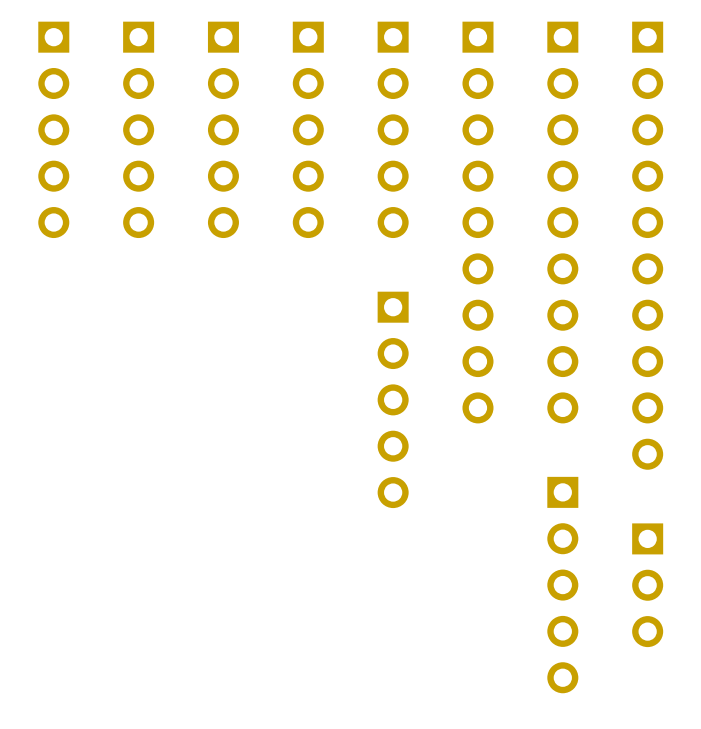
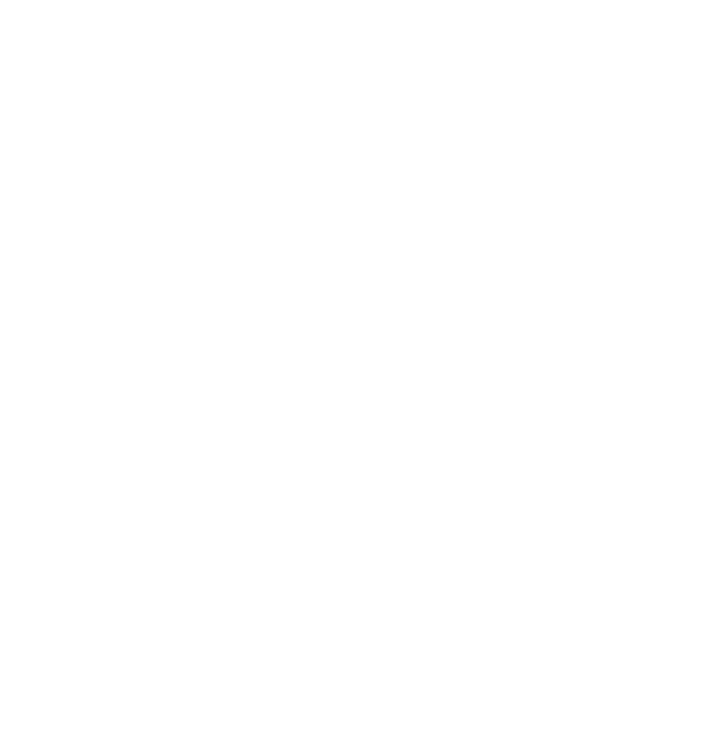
part: (53, 129) -> none
part: (138, 129) -> none
part: (223, 129) -> none
part: (308, 129) -> none
part: (393, 129) -> none
part: (477, 222) -> none
part: (562, 222) -> none
part: (647, 245) -> none
part: (393, 399) -> none
part: (562, 585) -> none
part: (647, 585) -> none

